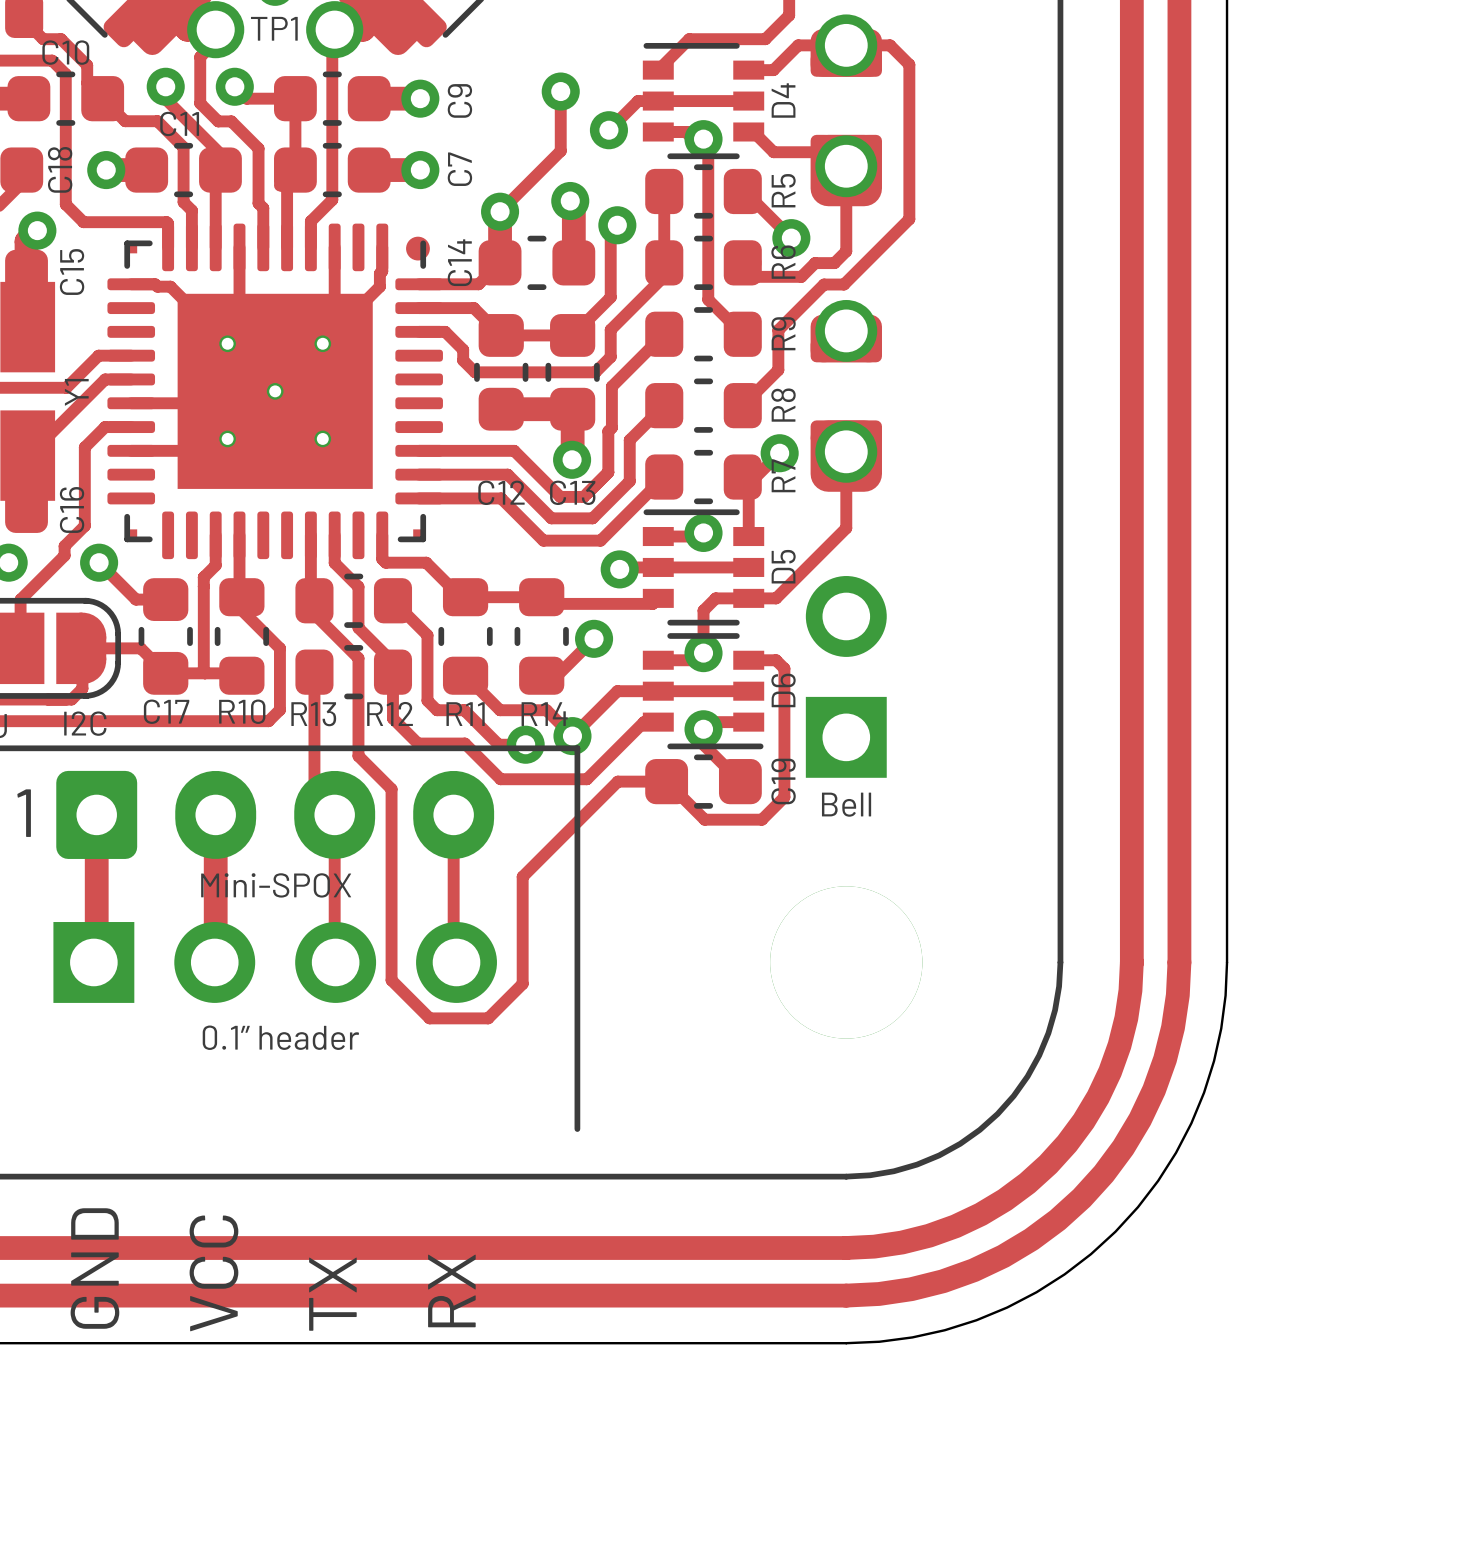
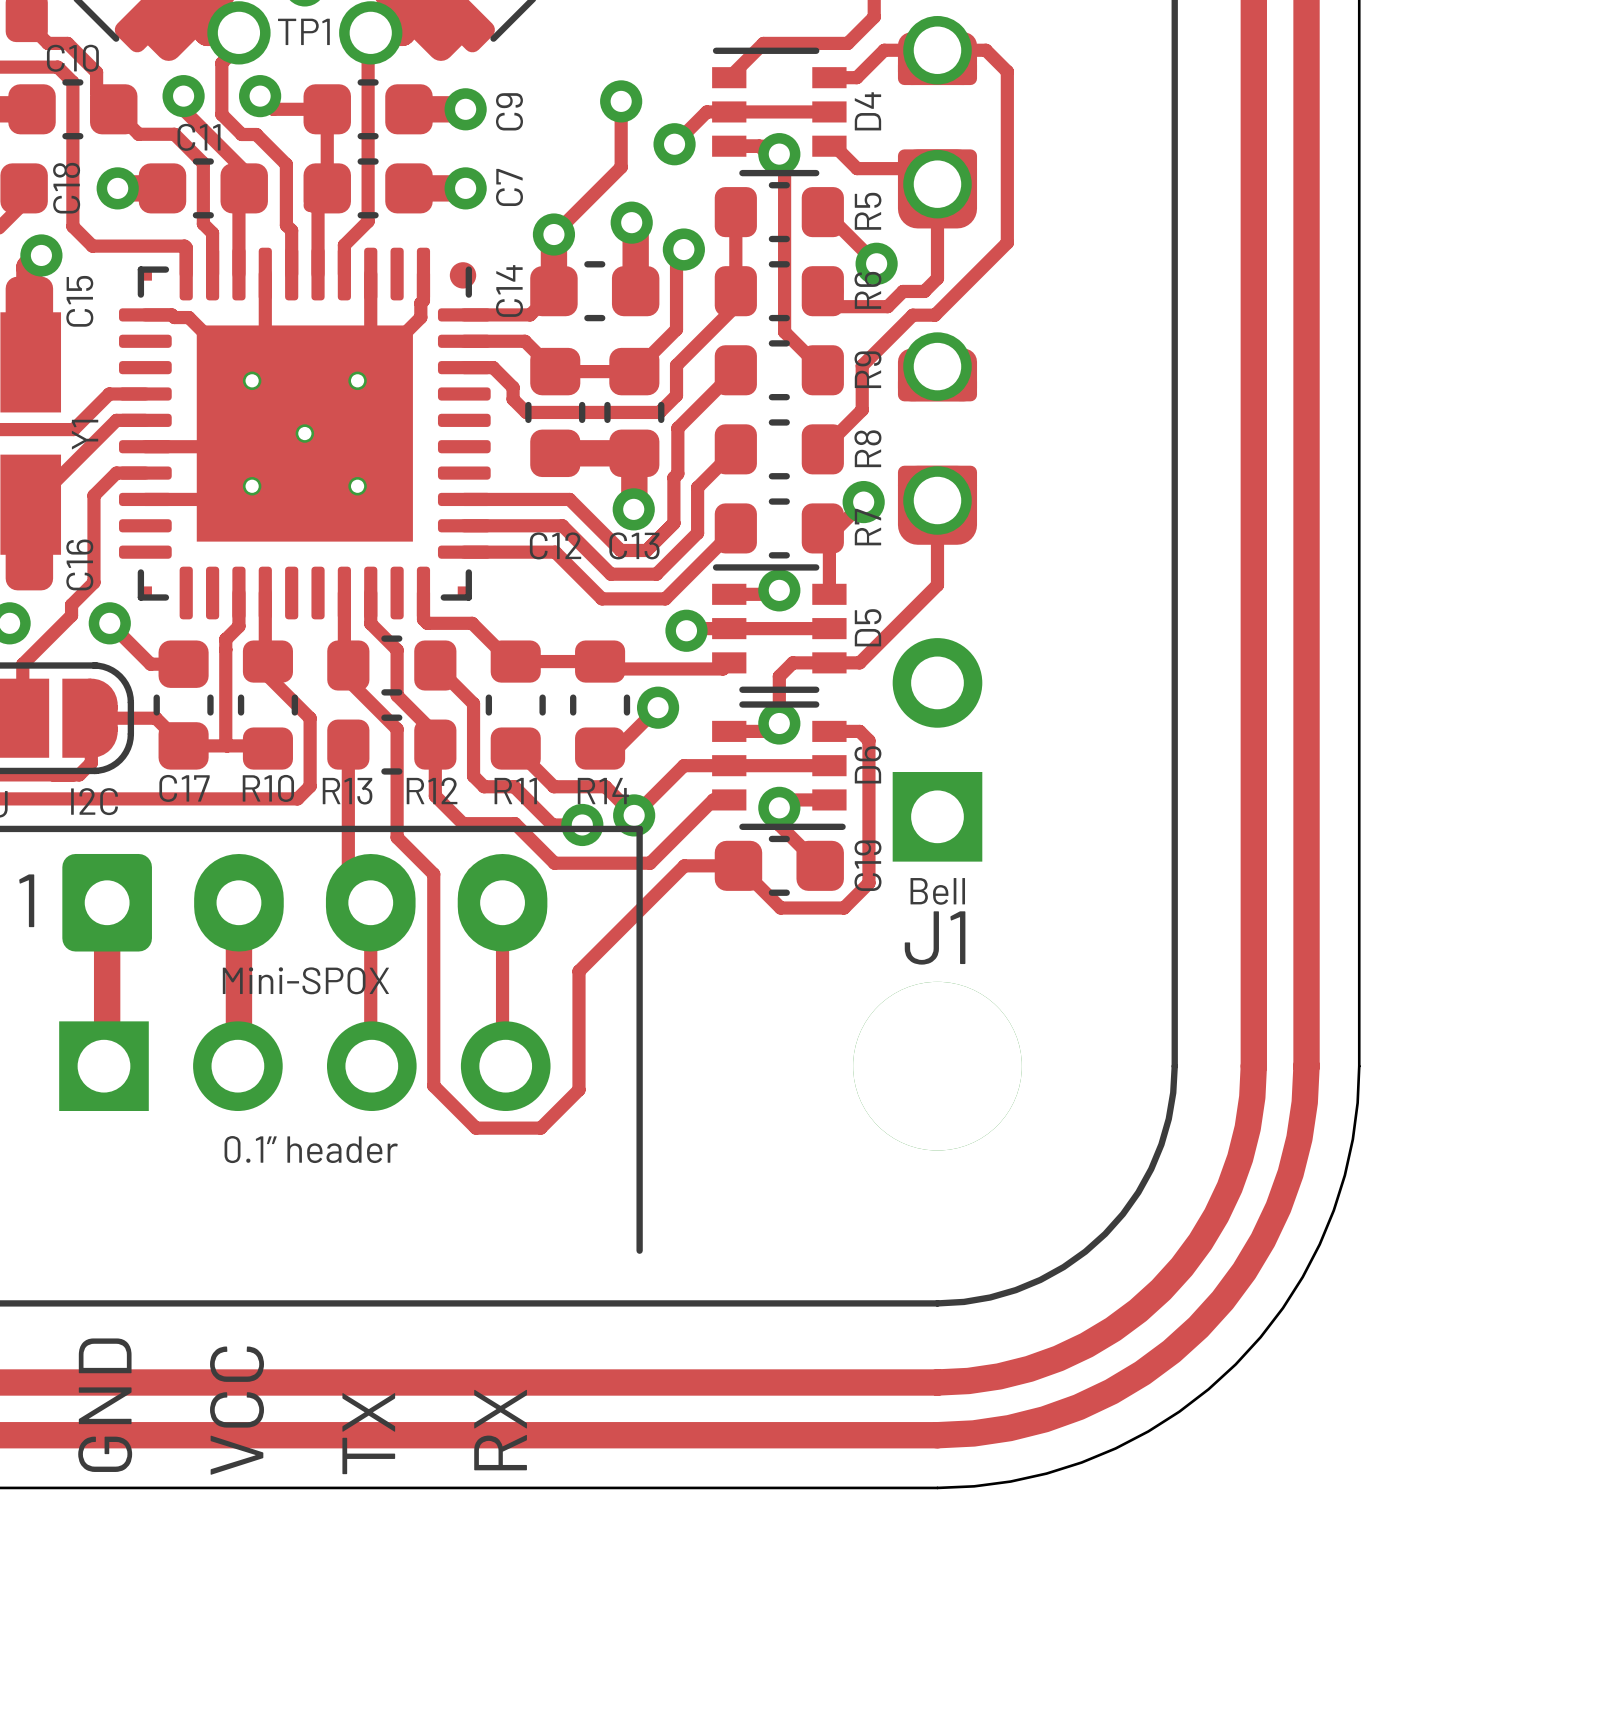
J1 name: none -> J1 (935, 937)

